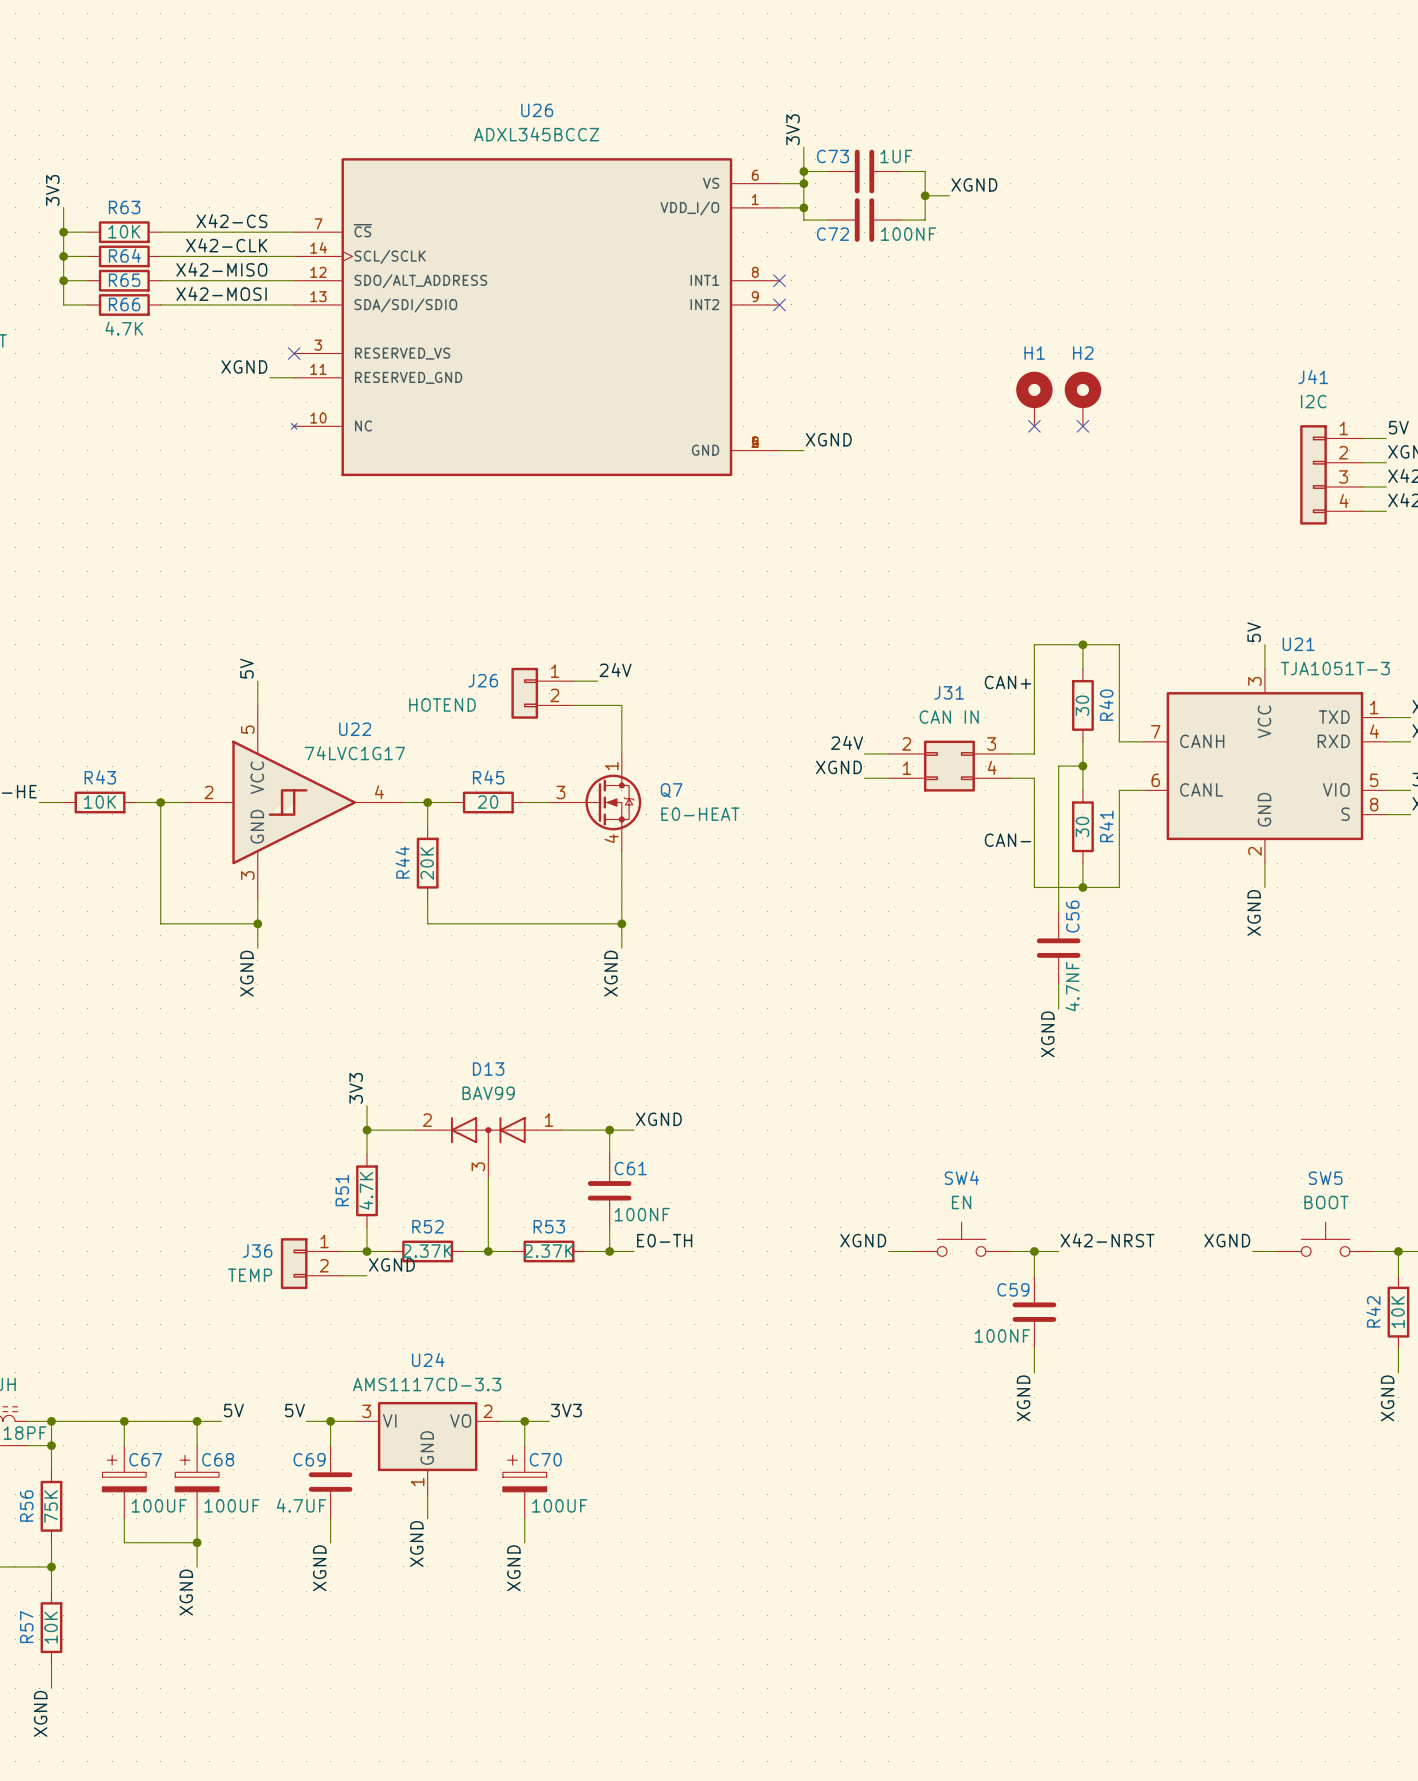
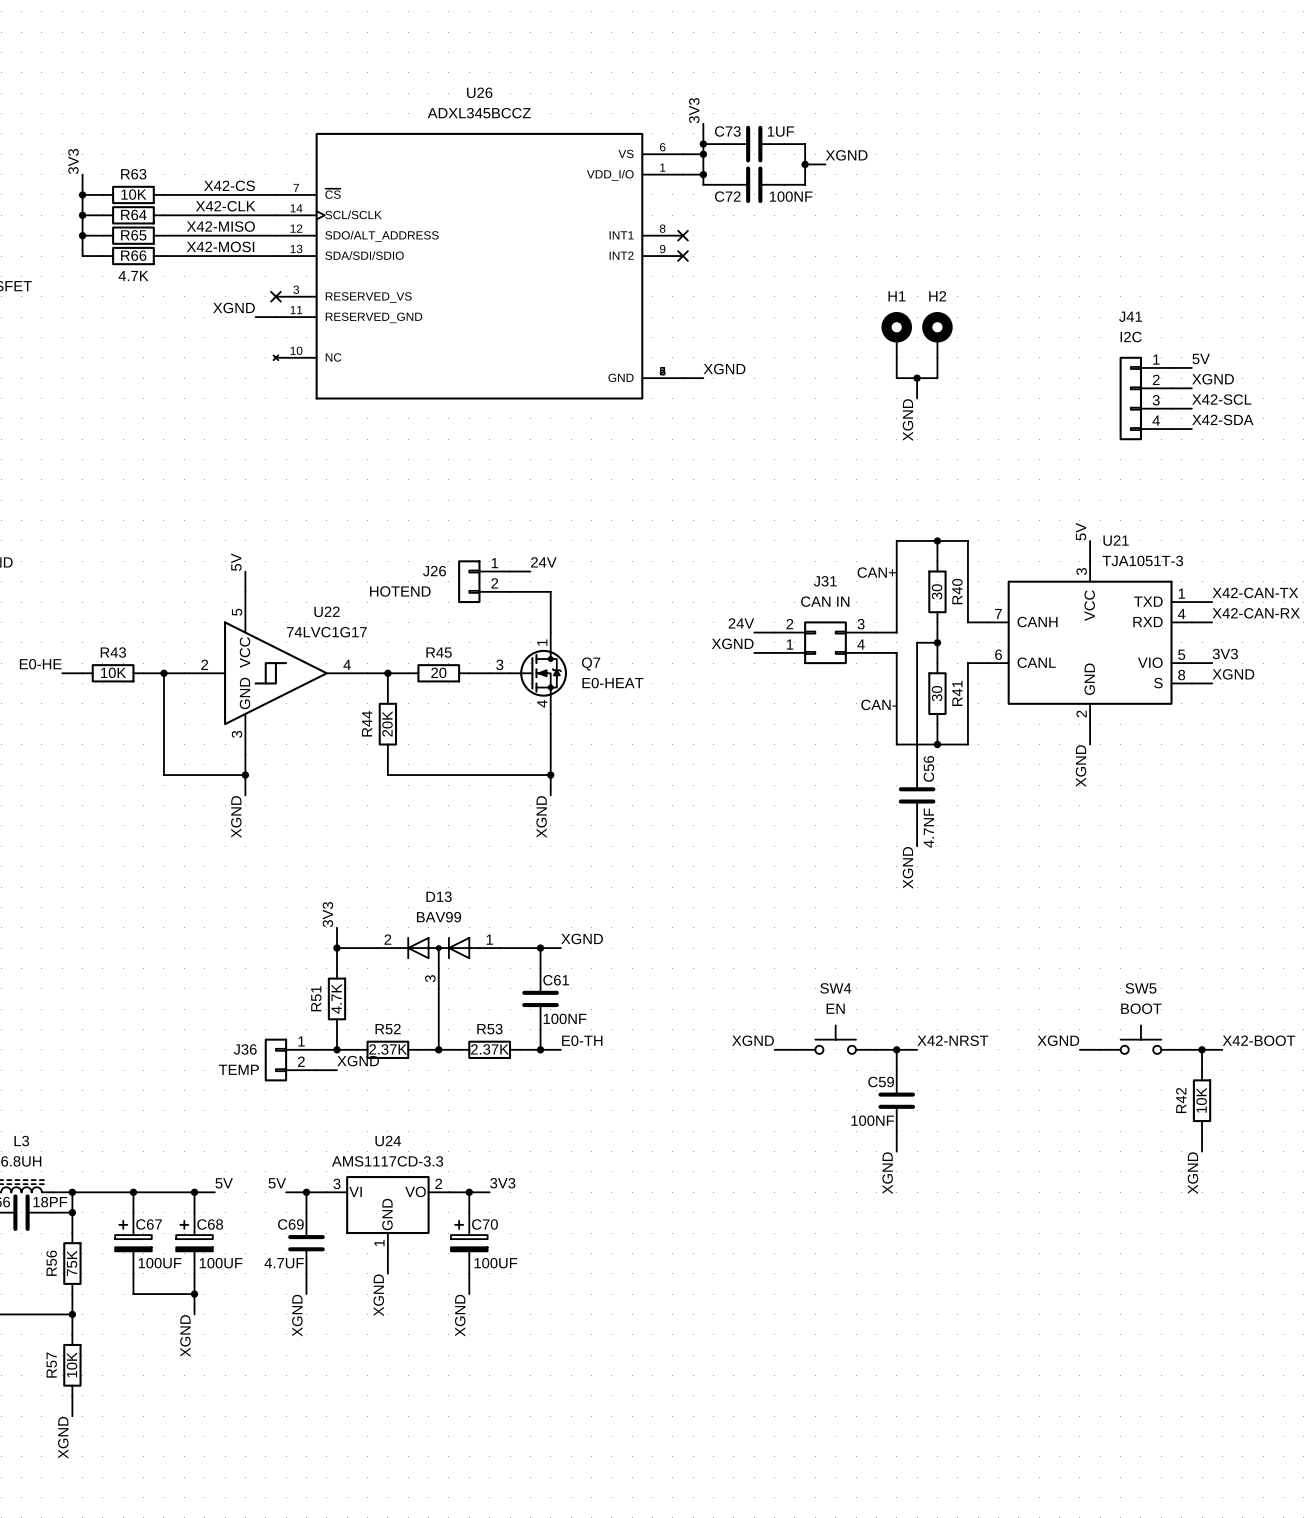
wire: none -> (896, 357) (896, 378) (937, 378) (937, 357)
no-connect mark: (1034, 426) -> none
no-connect mark: (1082, 426) -> none
wire: none -> (917, 378) (917, 398)
junction: none -> (917, 378)
label: none -> XGND (908, 420)

